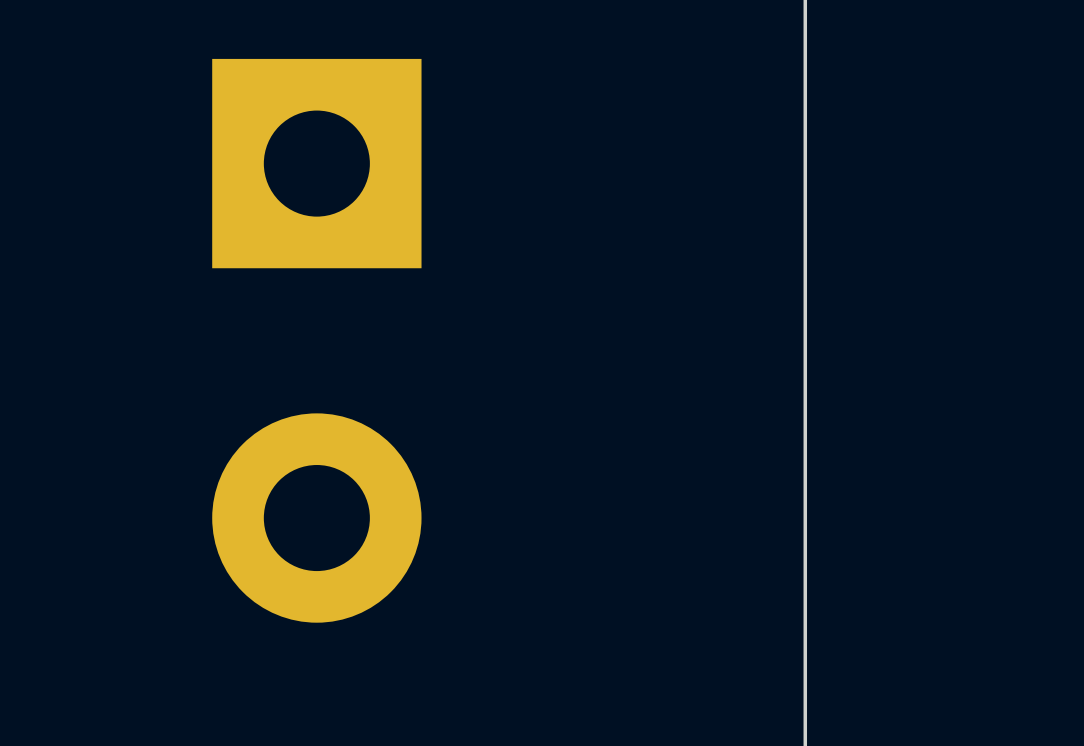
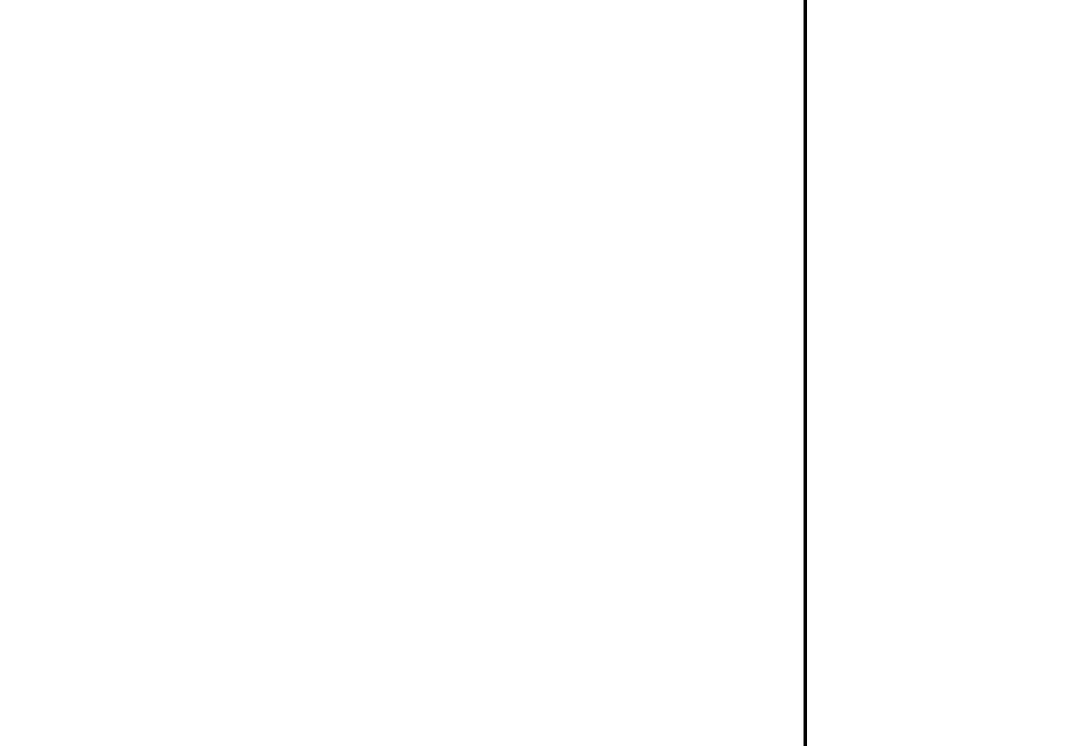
part: (316, 340) -> none

